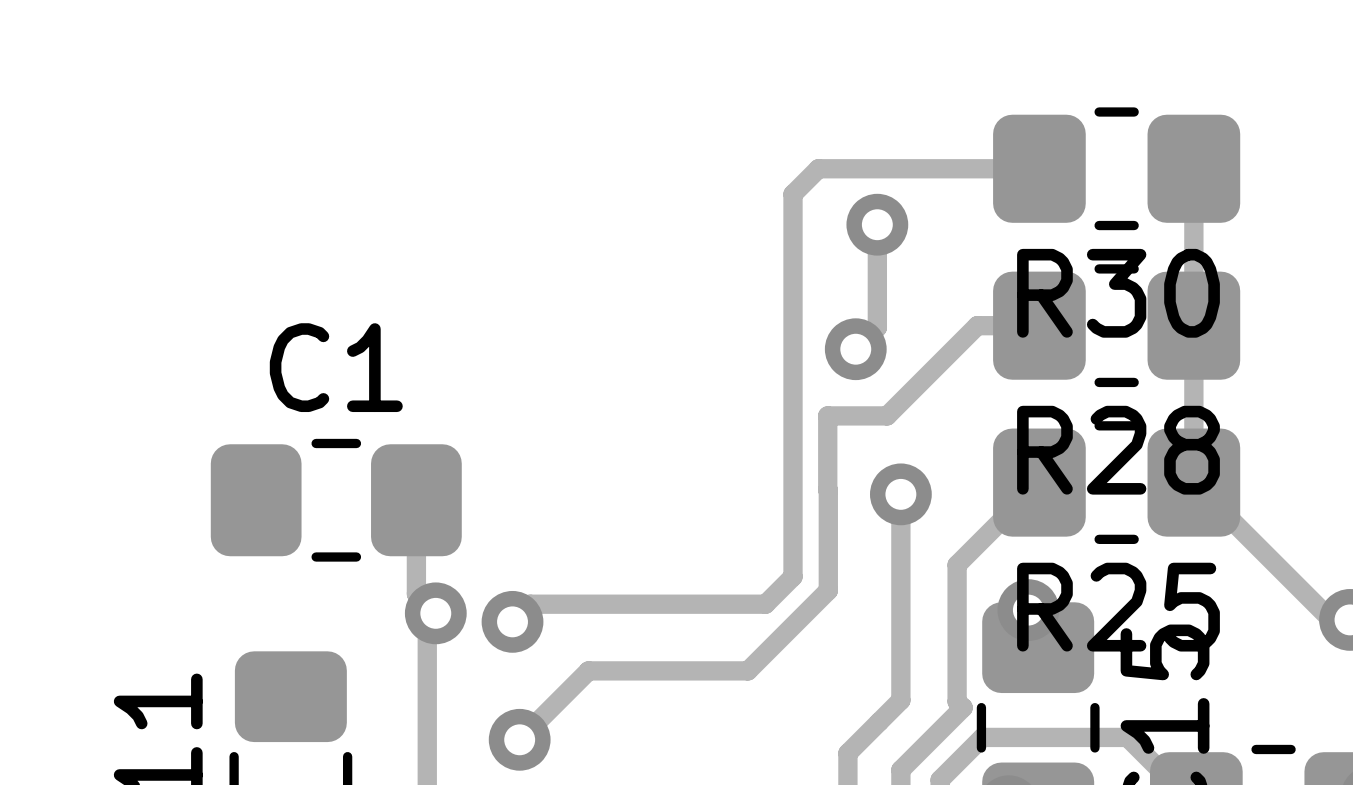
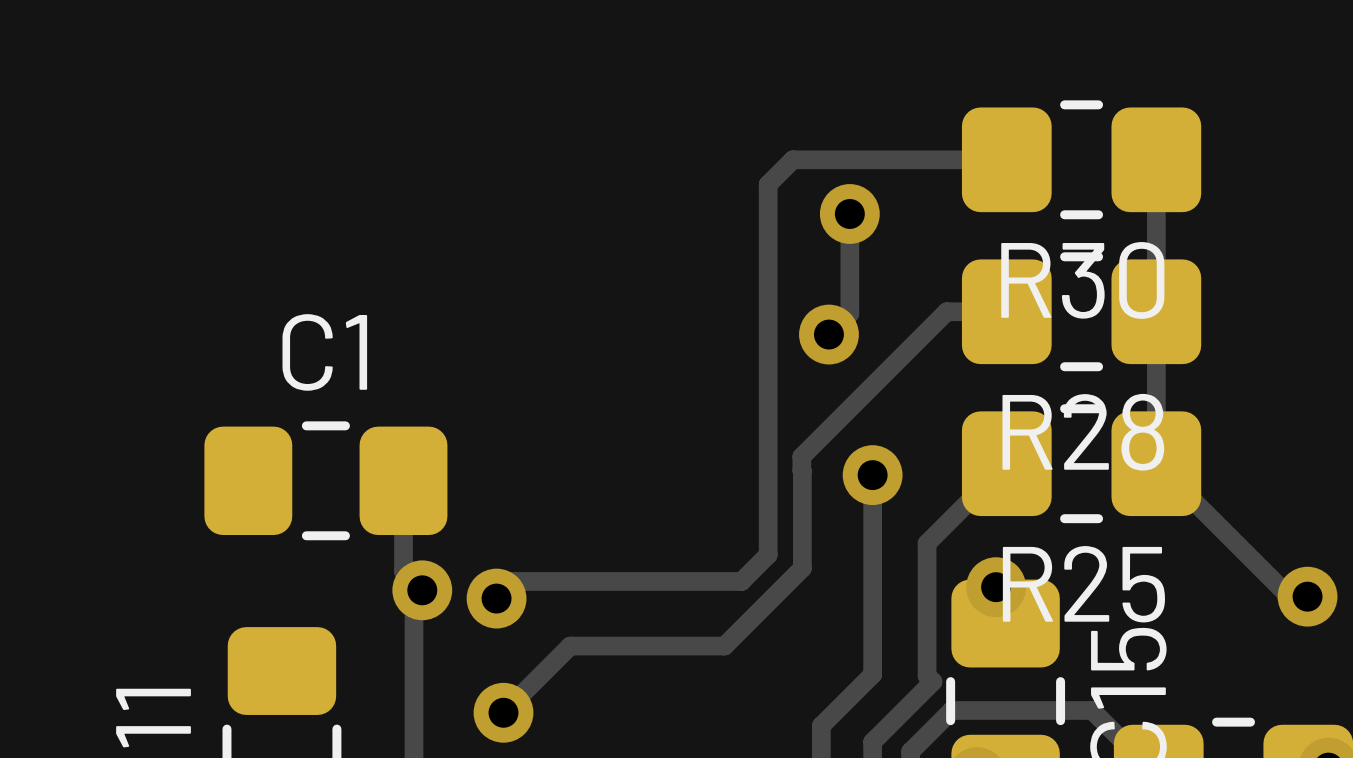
track: (887, 415) (827, 415) (827, 475) -> (859, 399) (801, 456)

